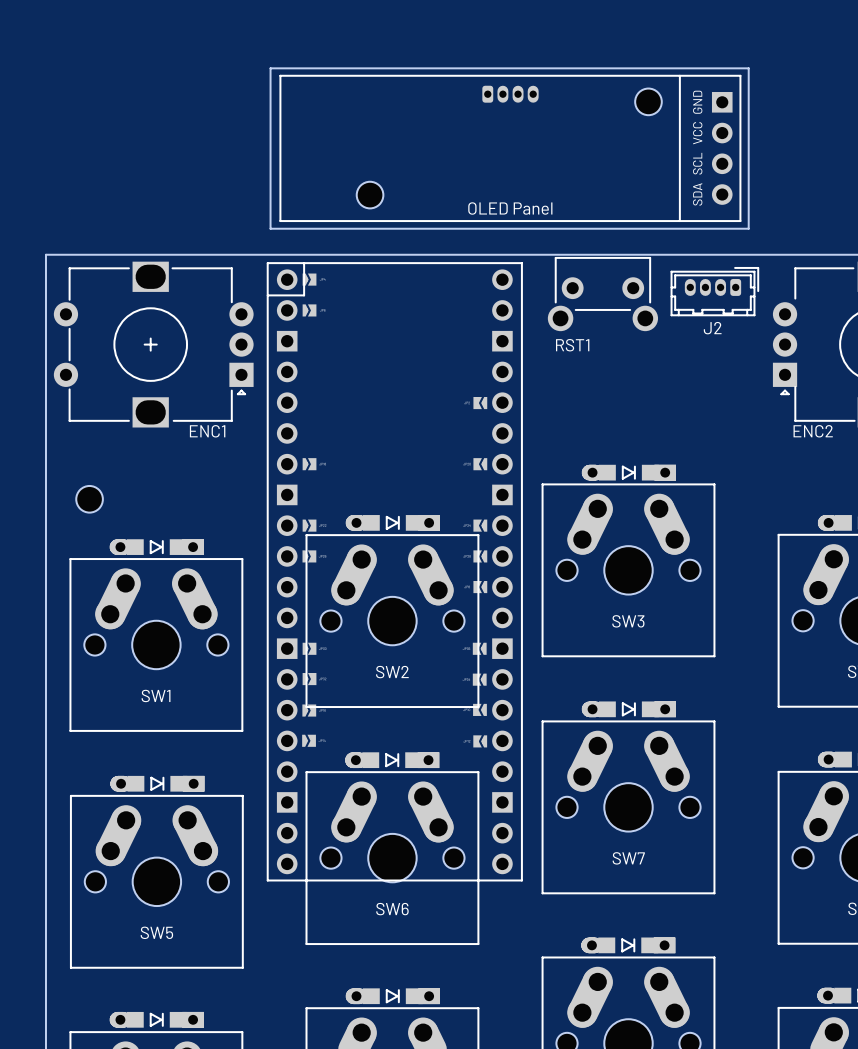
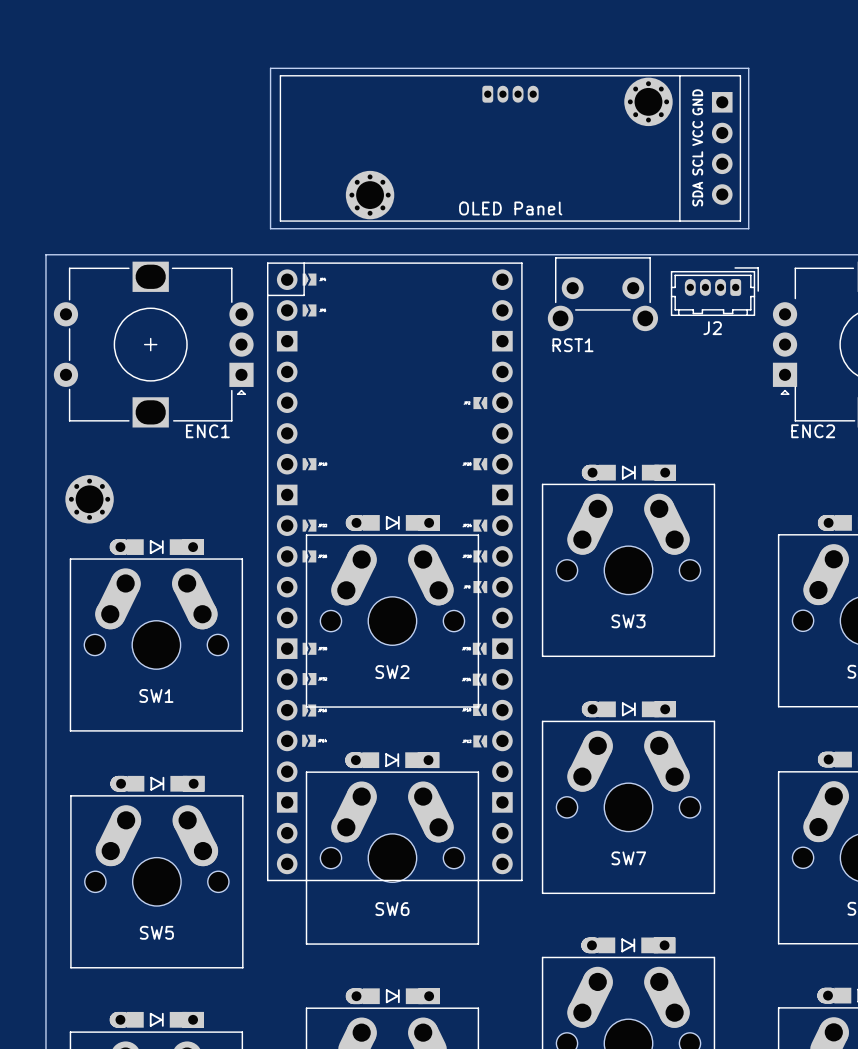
part footprint: [635, 88, 662, 116] -> [624, 77, 673, 127]
part footprint: [356, 181, 384, 209] -> [345, 170, 395, 220]
part footprint: [76, 485, 103, 513] -> [65, 475, 114, 524]

